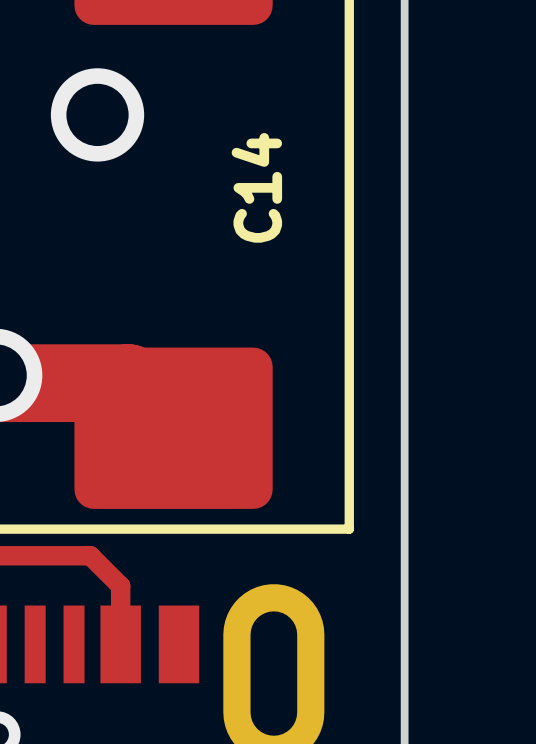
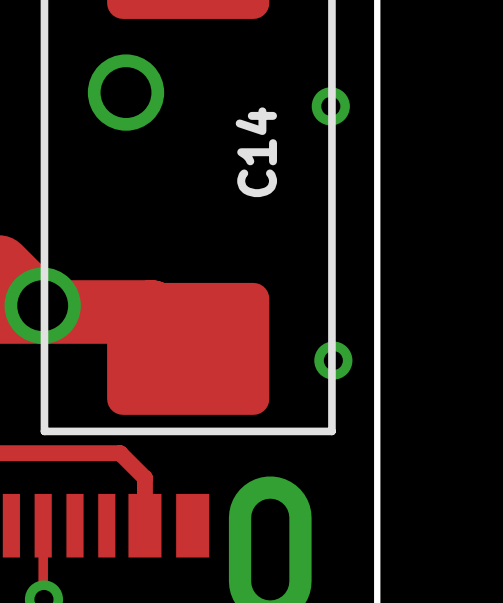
via: none -> (330, 106)
via: none -> (333, 360)

